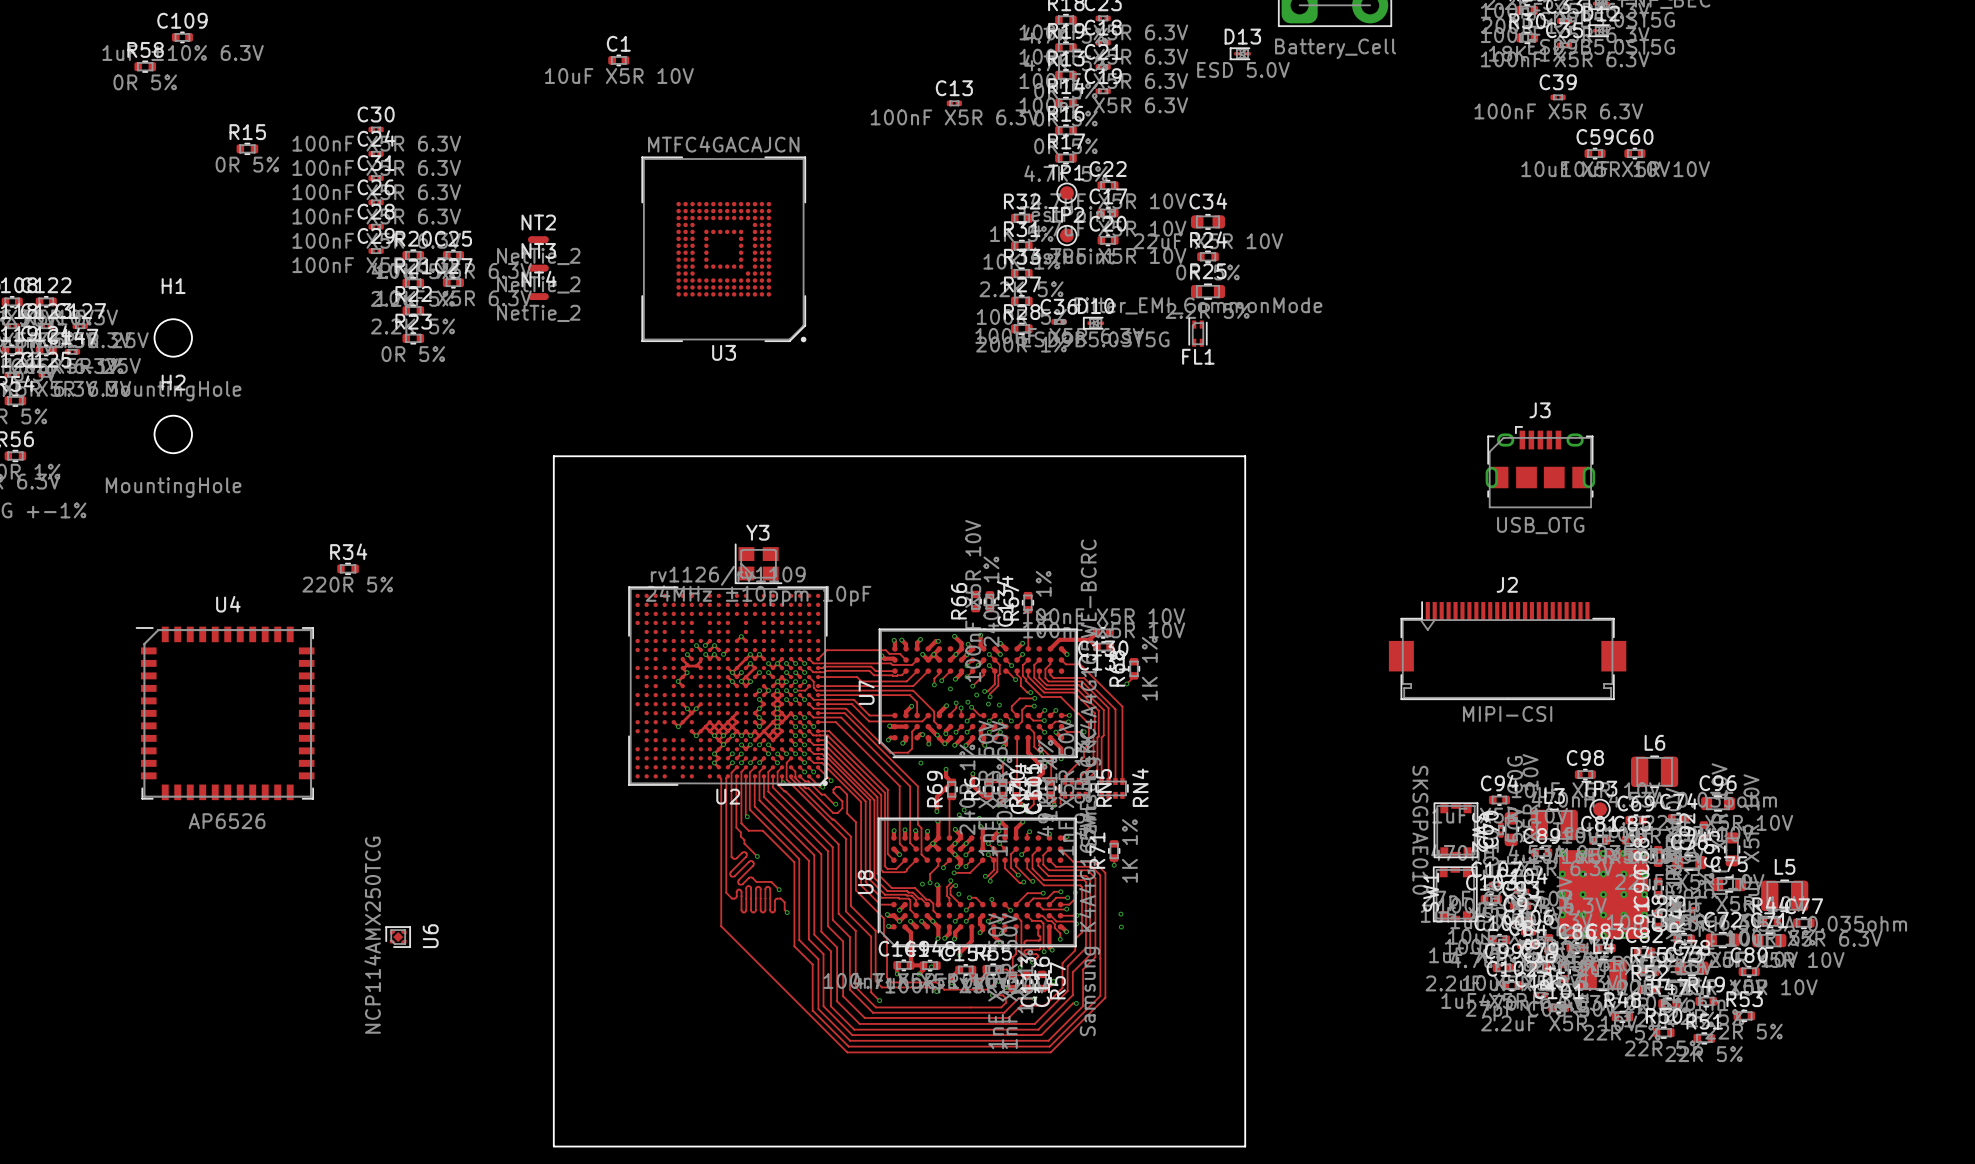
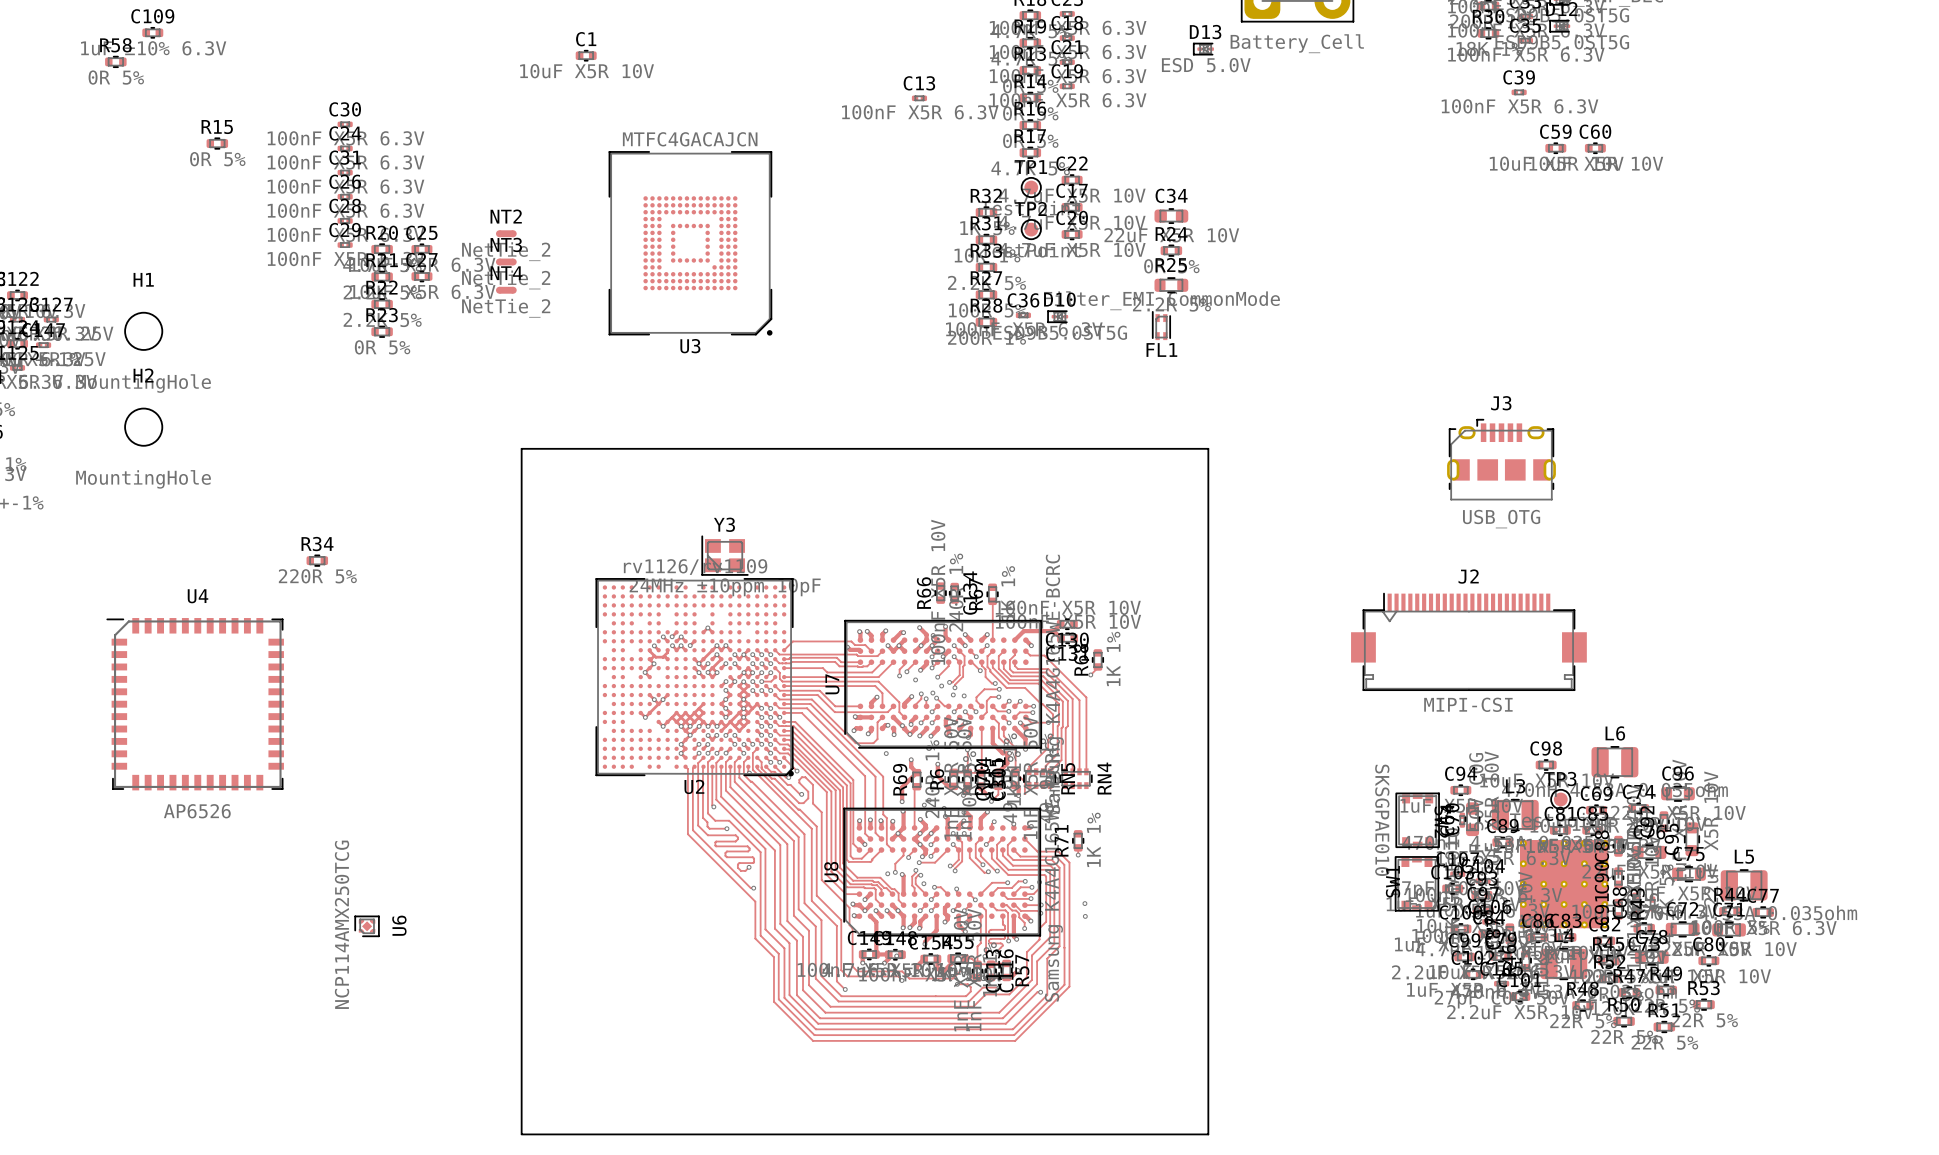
track: (731, 835) (731, 856) (735, 858) (743, 852) (746, 854) (730, 872) (730, 875) (734, 876) (751, 861) (753, 865) (738, 880) (738, 883) (742, 884) (751, 877) (756, 881) (771, 881) (779, 889) -> (698, 825) (707, 835) (735, 835) (737, 839) (735, 841) (716, 841) (715, 845) (747, 846) (749, 848) (748, 851) (726, 851) (725, 855) (752, 857) (753, 863) (737, 864) (741, 870) (745, 870) (749, 867)
track: (743, 838) (744, 843) (757, 856) -> (709, 828) (726, 828)
via: none -> (726, 828)
track: (726, 840) (726, 892) (734, 898) (737, 890) (741, 890) (741, 911) (746, 910) (746, 888) (748, 886) (751, 888) (752, 911) (755, 910) (755, 888) (758, 886) (760, 888) (760, 910) (765, 911) (765, 888) (767, 886) (770, 888) (770, 911) (774, 910) (775, 899) (780, 898) (784, 902) (784, 910) (787, 912) -> (692, 830) (750, 888) (753, 888)
track: (721, 844) (721, 926) (807, 1012) -> (687, 834) (755, 901) (755, 938) (773, 957) (773, 1001)
via: (757, 856) -> none
via: none -> (749, 867)
via: (779, 889) -> none
via: none -> (753, 888)
via: (787, 912) -> none

